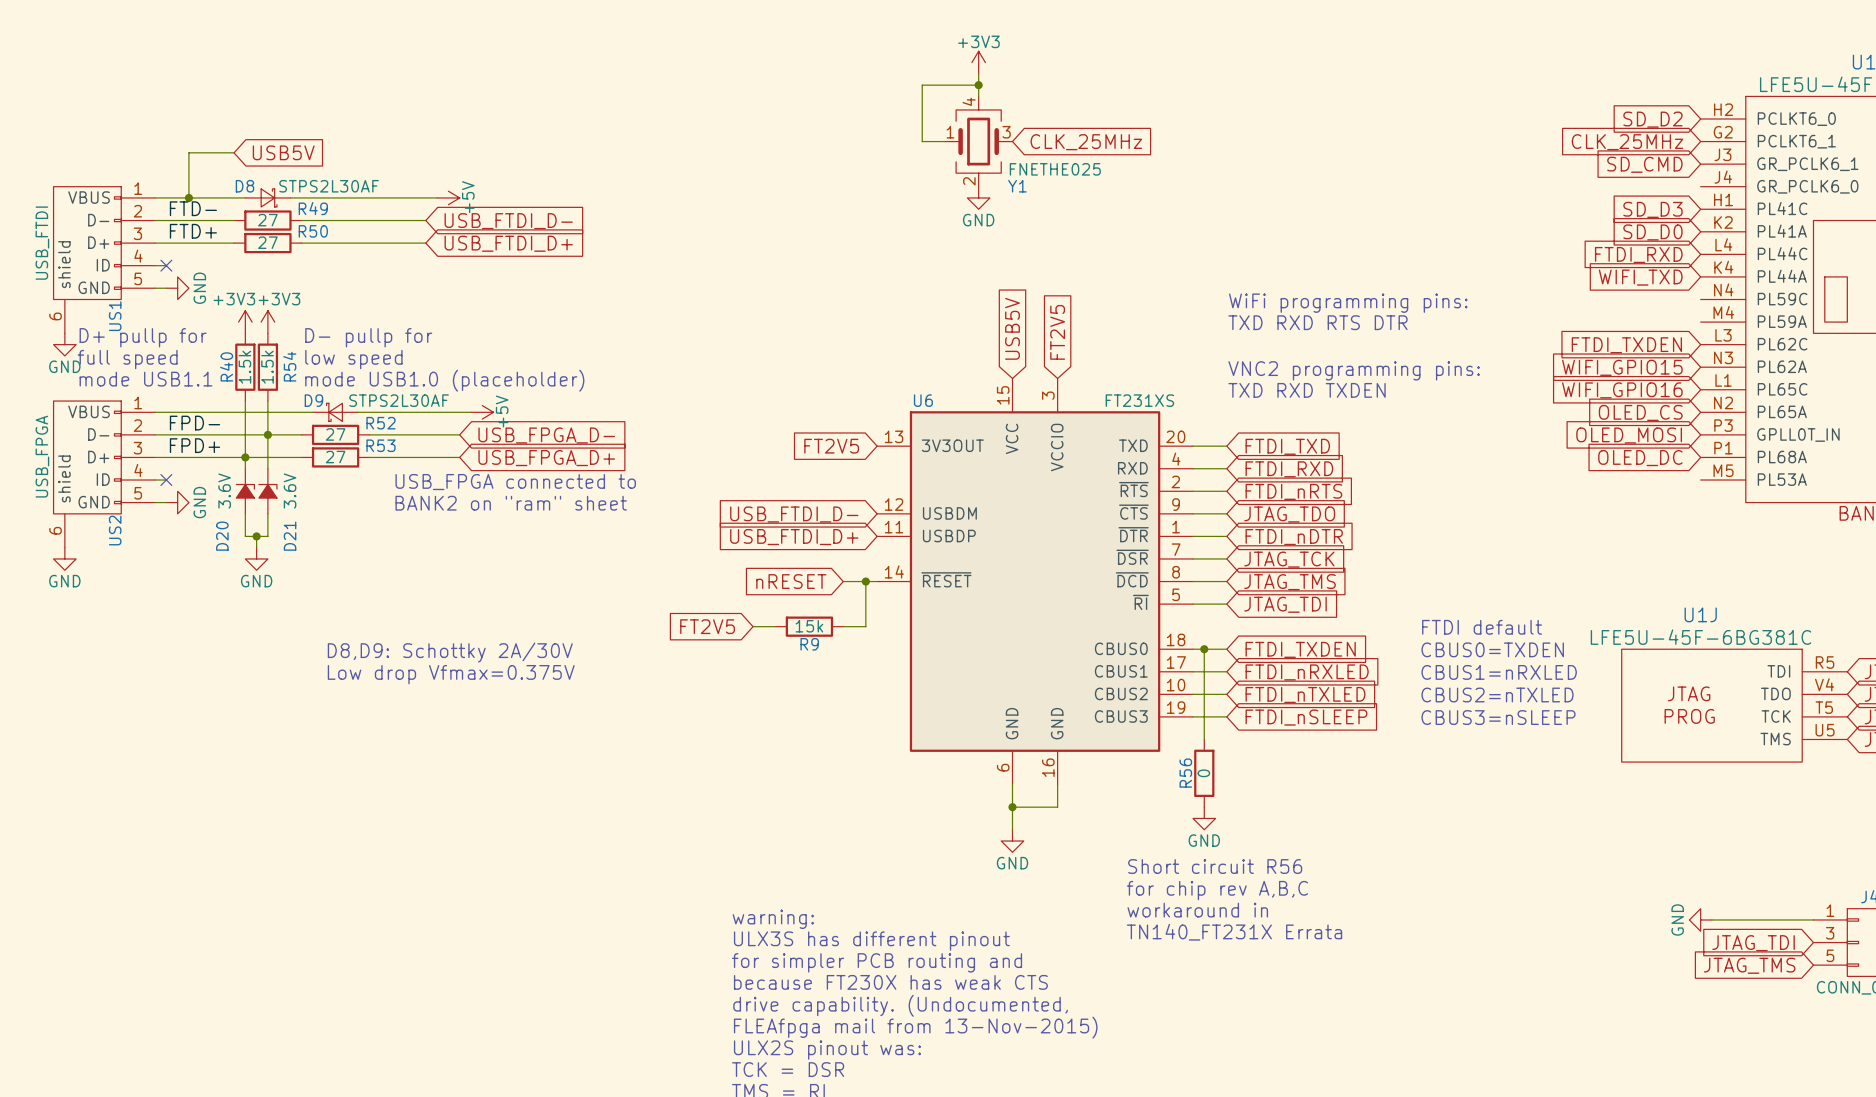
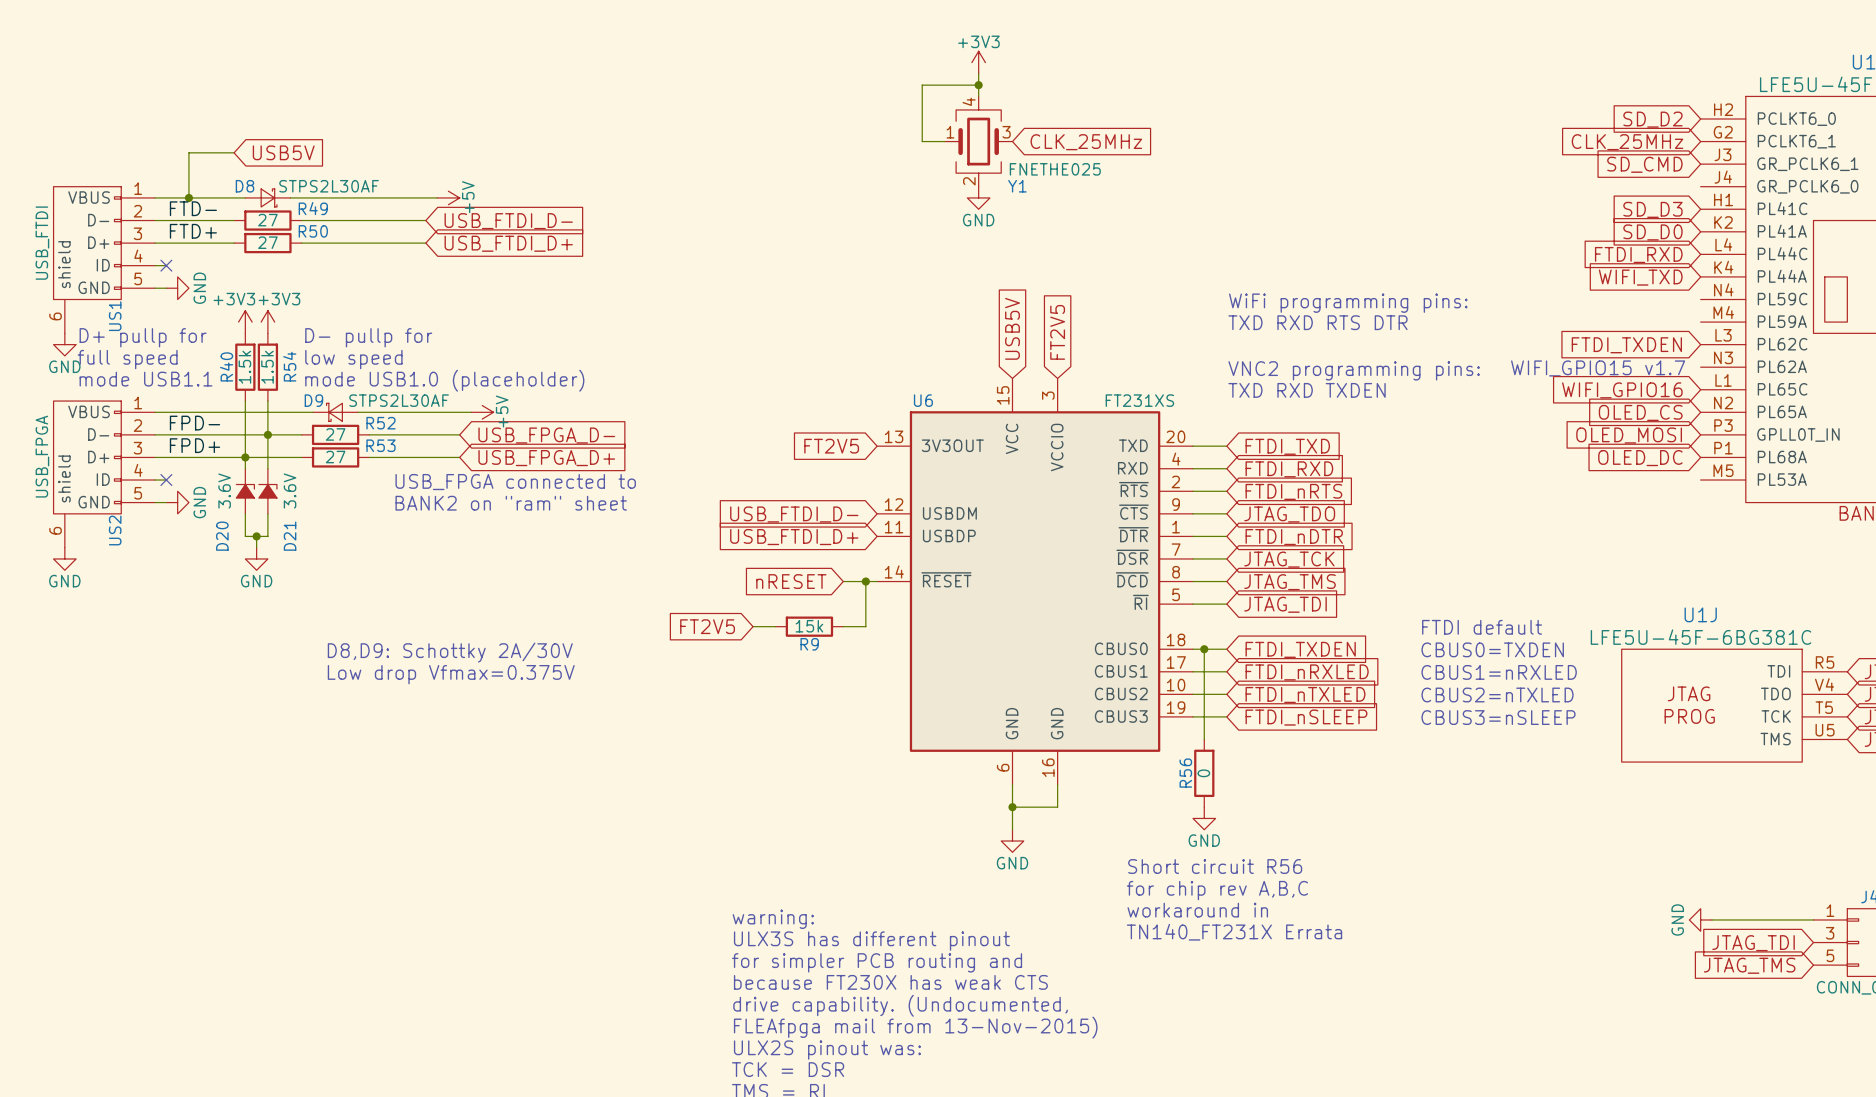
global label: WIFI_GPIO15 (1622, 367) -> none
text: none -> WIFI_GPIO15 v1.7 (1598, 368)

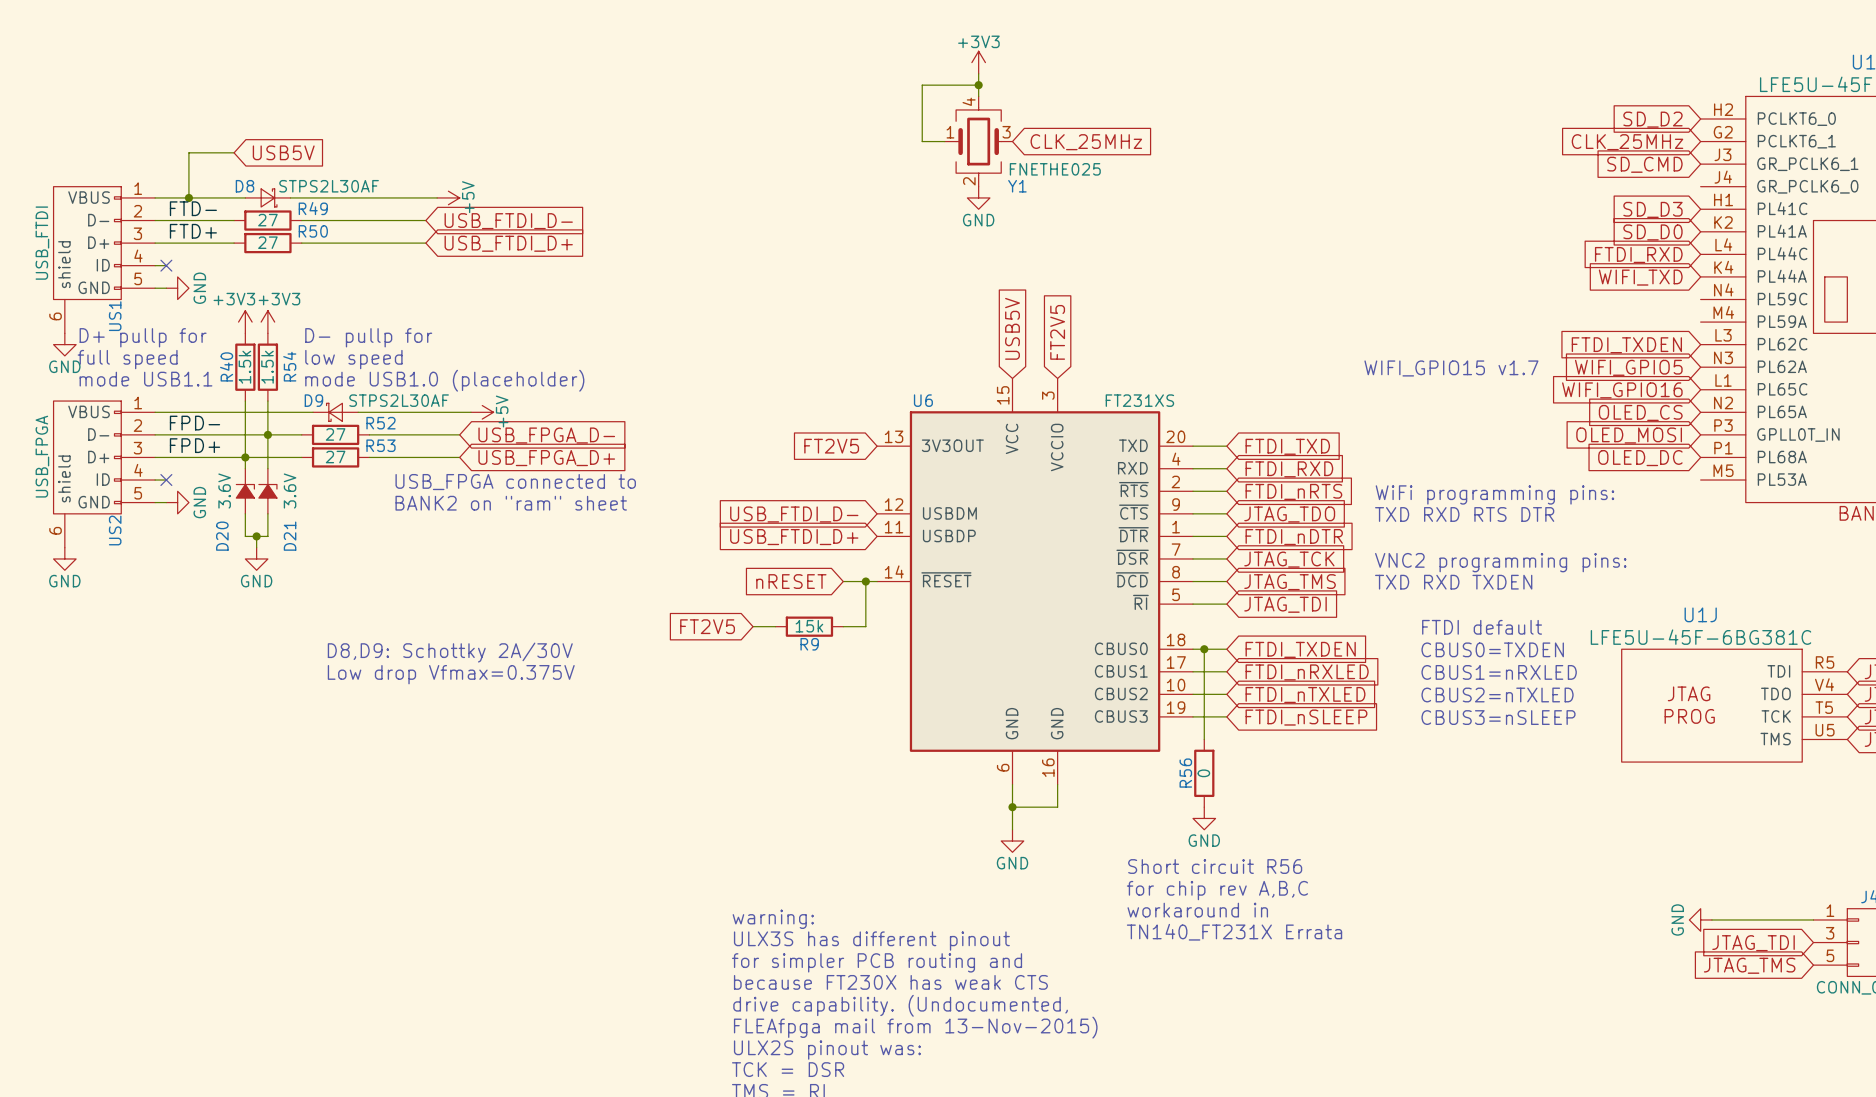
text: WiFi programming pins: (1348, 303) -> none
text: TXD RXD RTS DTR (1317, 322) -> none
global label: none -> WIFI_GPIO5 (1628, 367)
text position: WIFI_GPIO15 v1.7 (1598, 368) -> WIFI_GPIO15 v1.7 (1451, 368)
text: VNC2 programming pins: (1354, 370) -> none
text: TXD RXD TXDEN (1307, 390) -> none
text: none -> WiFi programming pins: (1494, 494)
text: none -> TXD RXD RTS DTR (1464, 514)
text: none -> VNC2 programming pins: (1500, 562)
text: none -> TXD RXD TXDEN (1453, 582)

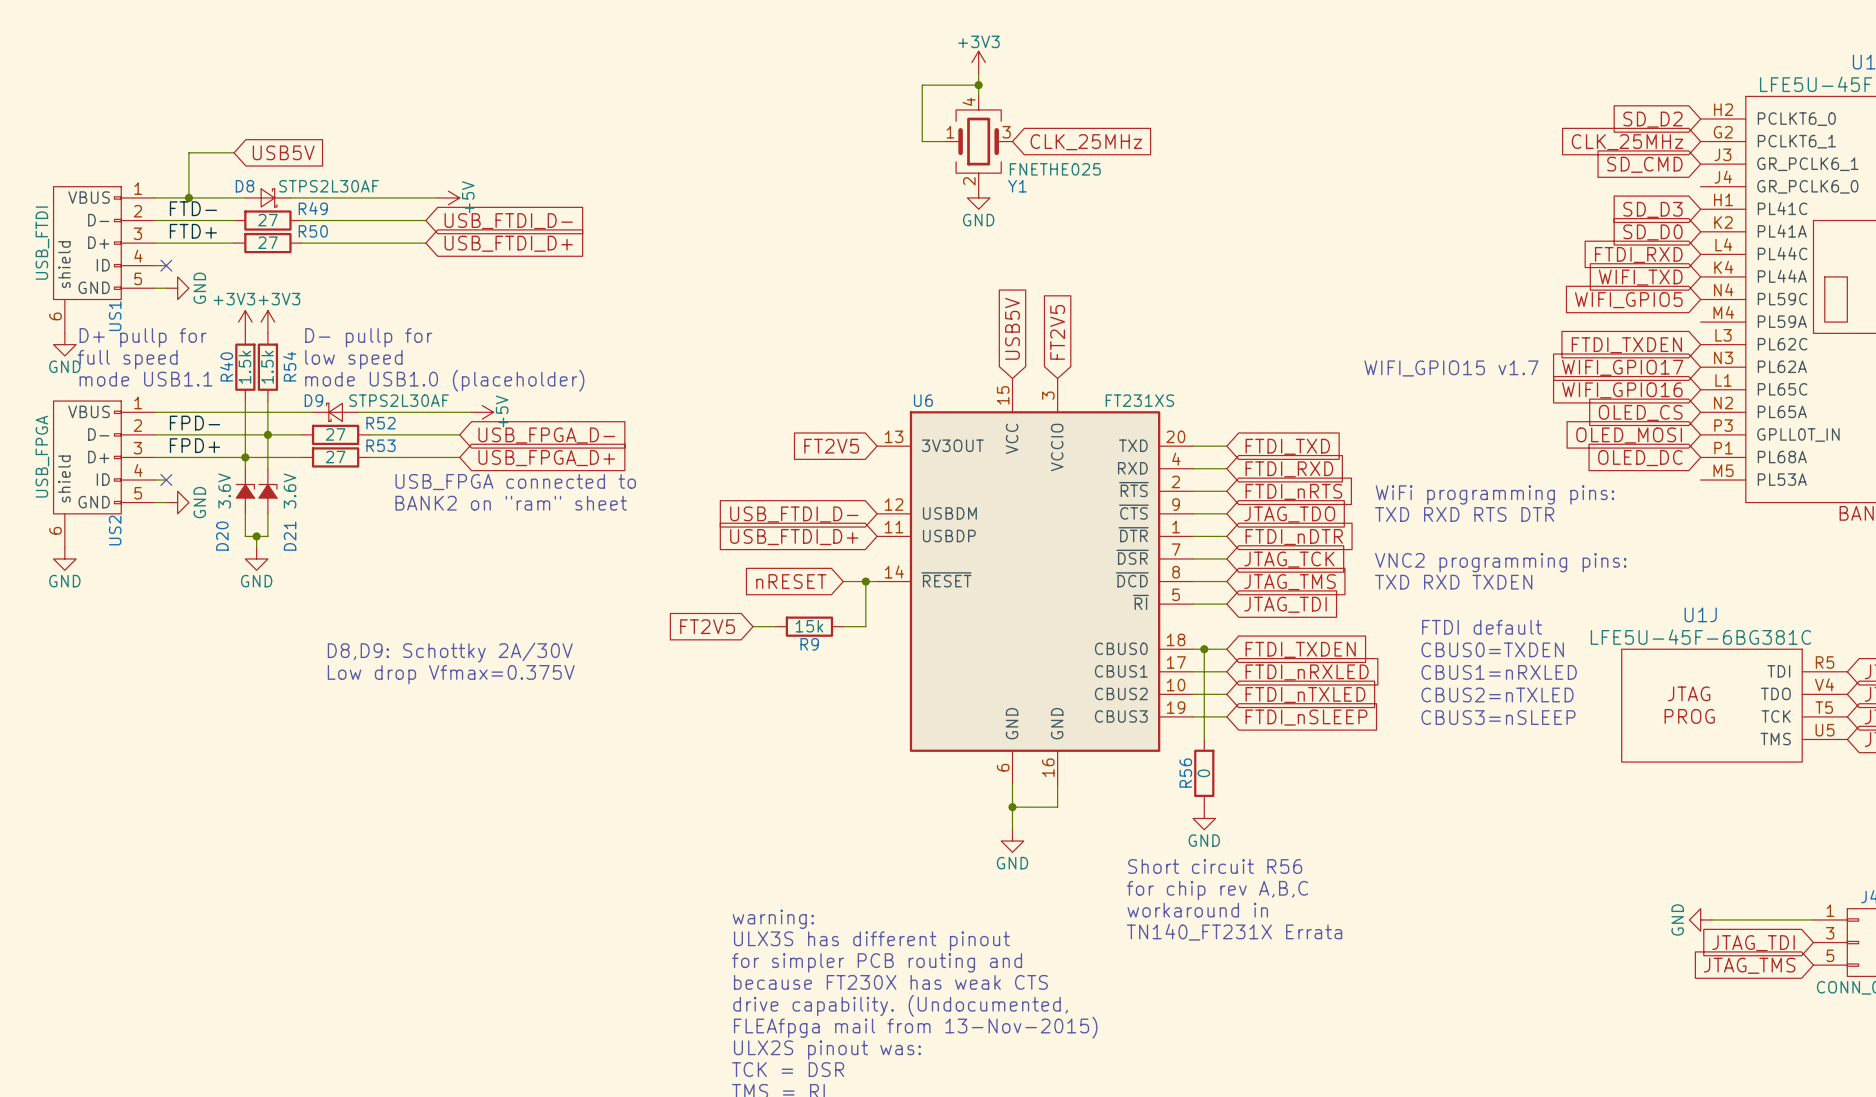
global label: none -> WIFI_GPIO5 (1628, 300)
global label: WIFI_GPIO5 (1628, 367) -> WIFI_GPIO17 (1622, 367)

